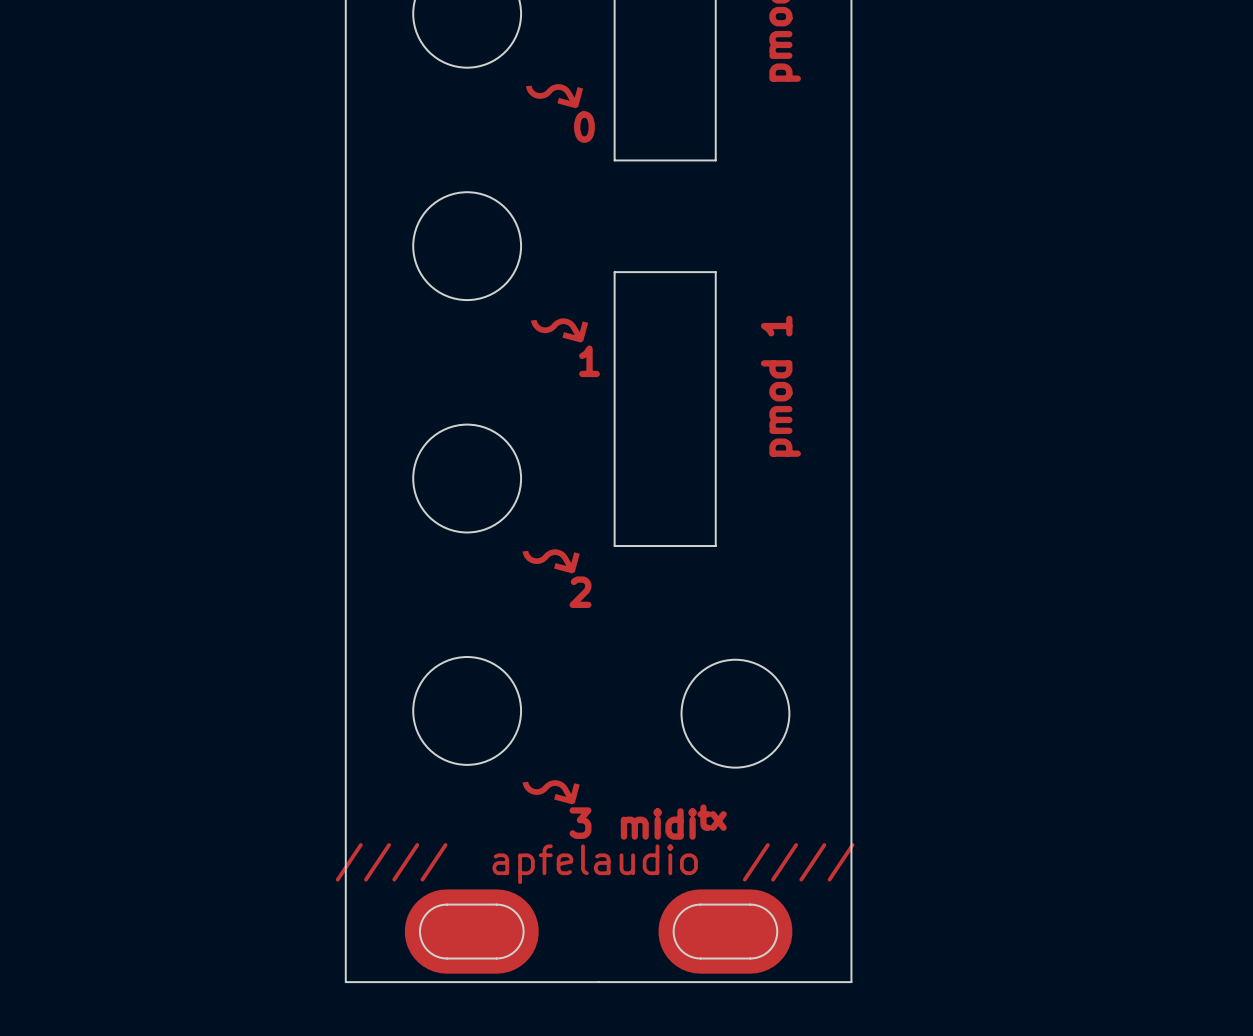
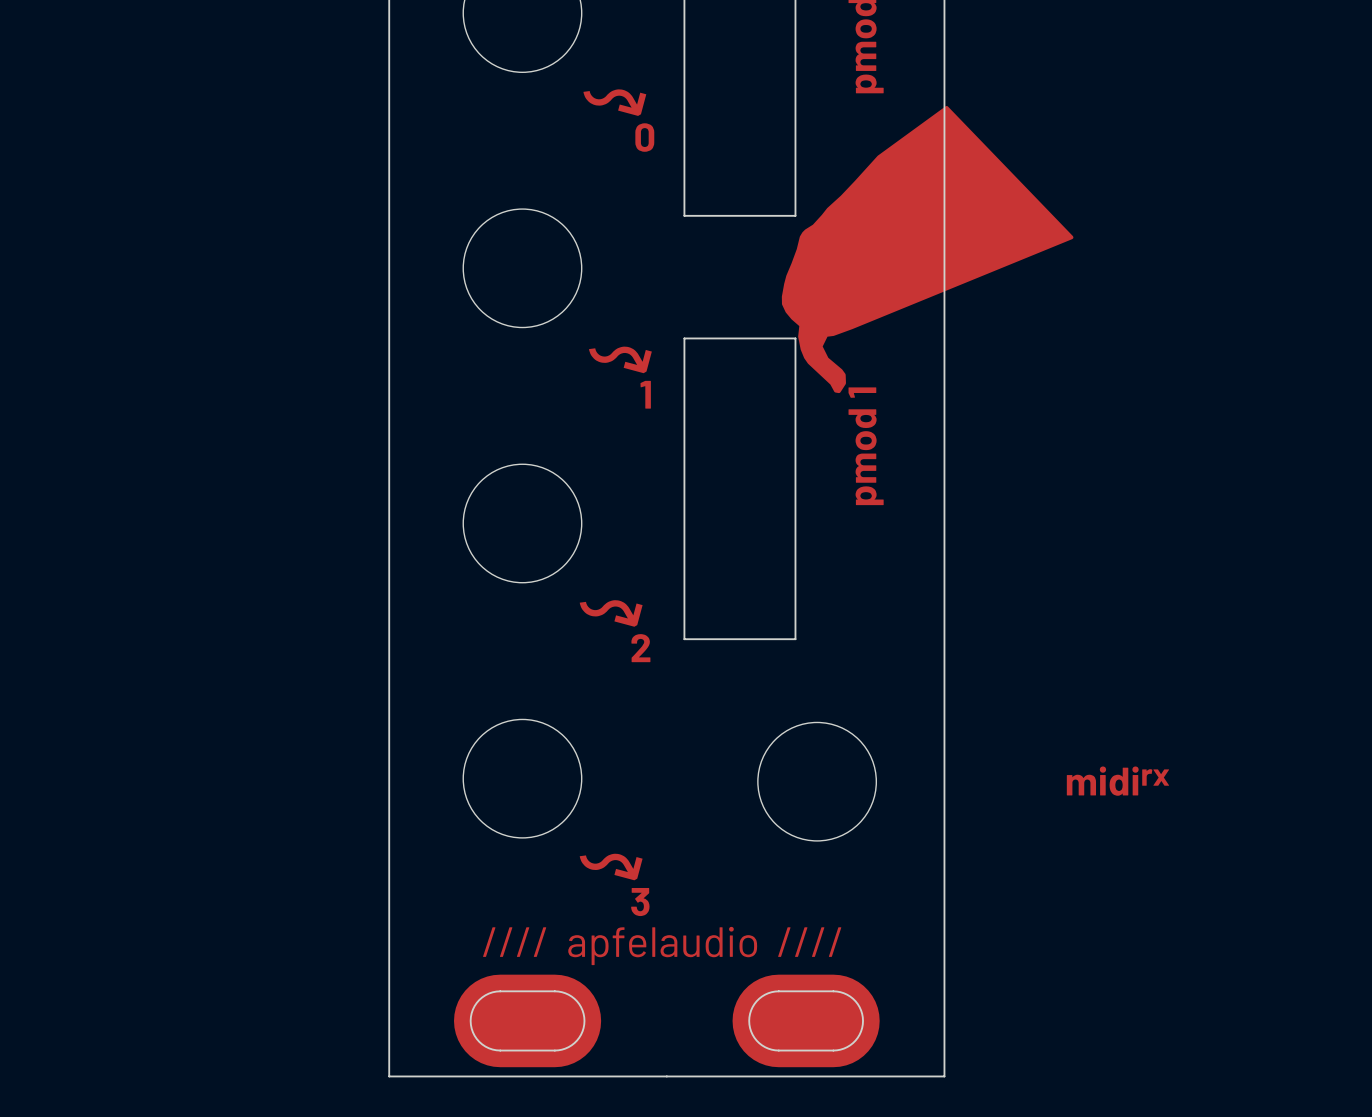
drawing: none -> [781, 105, 1074, 394]
board edge: (614, 160) (715, 160) -> (684, 174) (684, 215) (795, 215) (795, 174)
board edge: (614, 310) (614, 272) (715, 272) (715, 310) -> (684, 338) (795, 338)
board edge: (614, 546) (715, 546) -> (684, 597) (684, 639) (795, 639) (795, 597)
text: none -> midirx (1117, 781)
text: miditx (673, 822) -> none

